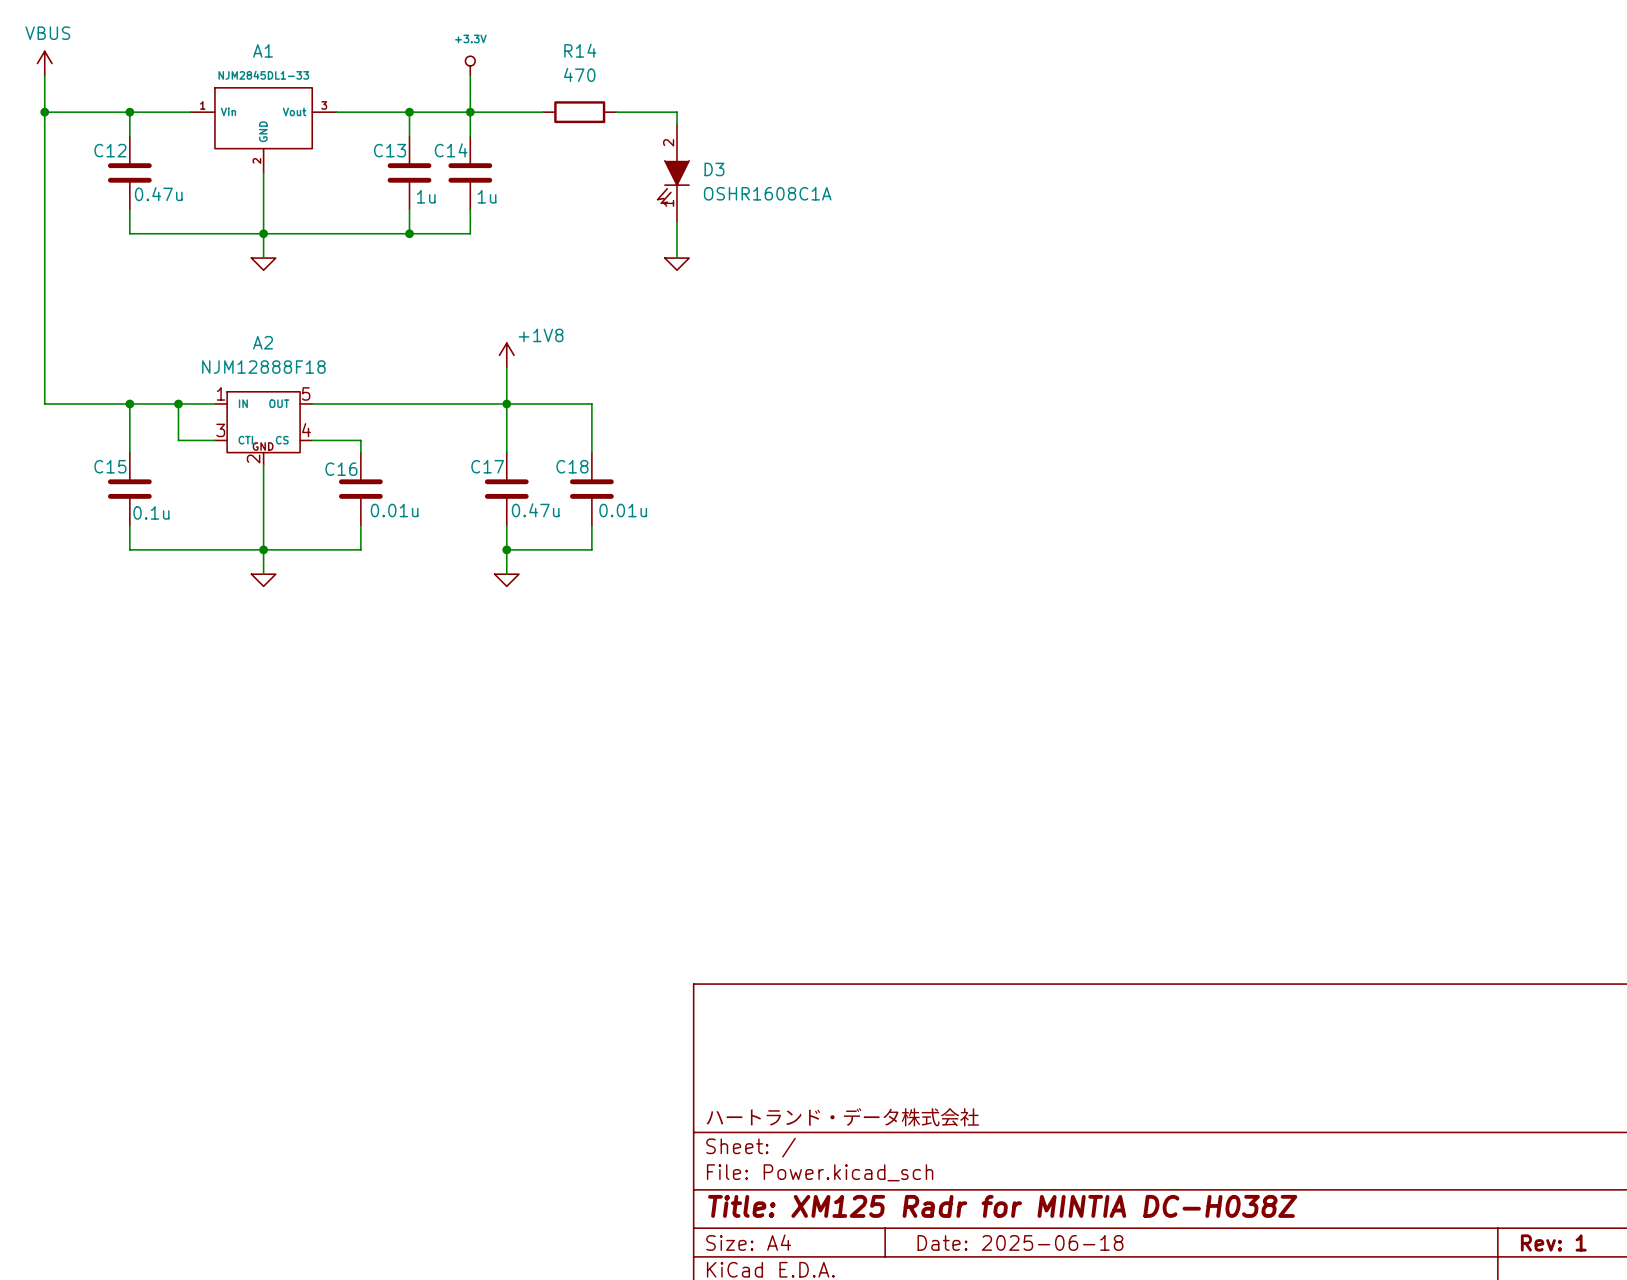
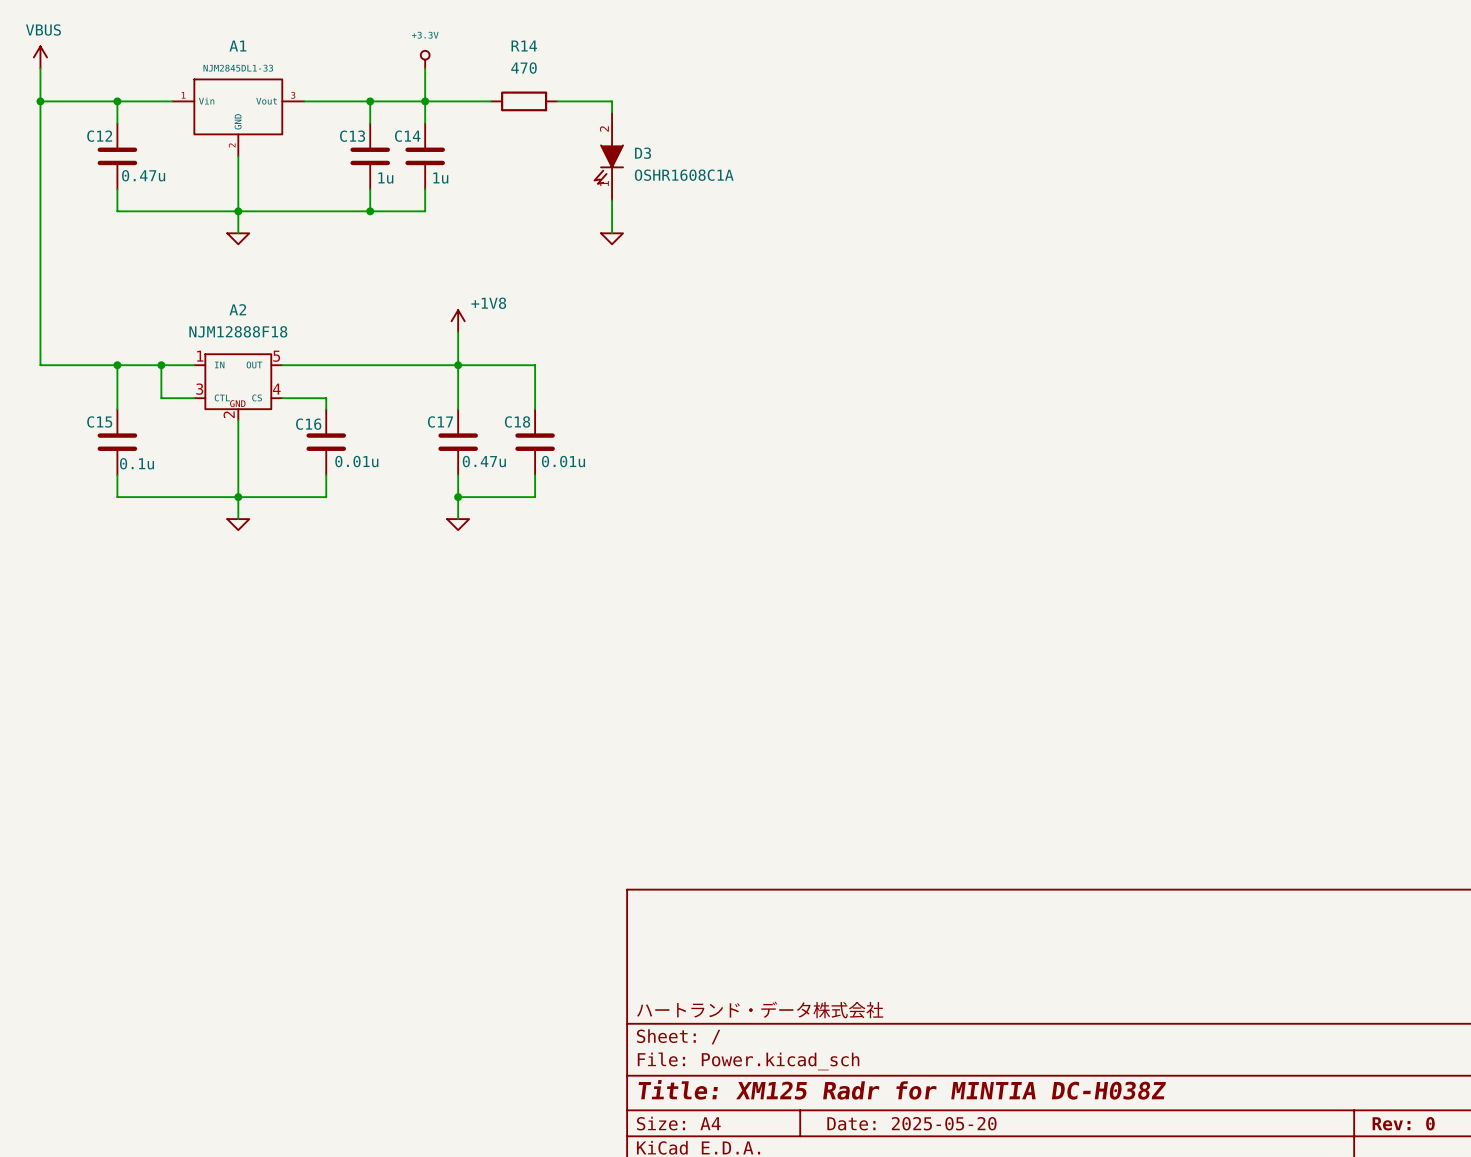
title block: Date: 2025-06-18 (1020, 1242) -> Date: 2025-05-20 (911, 1123)
title block: Rev: 1 (1553, 1242) -> Rev: 0 (1403, 1123)

